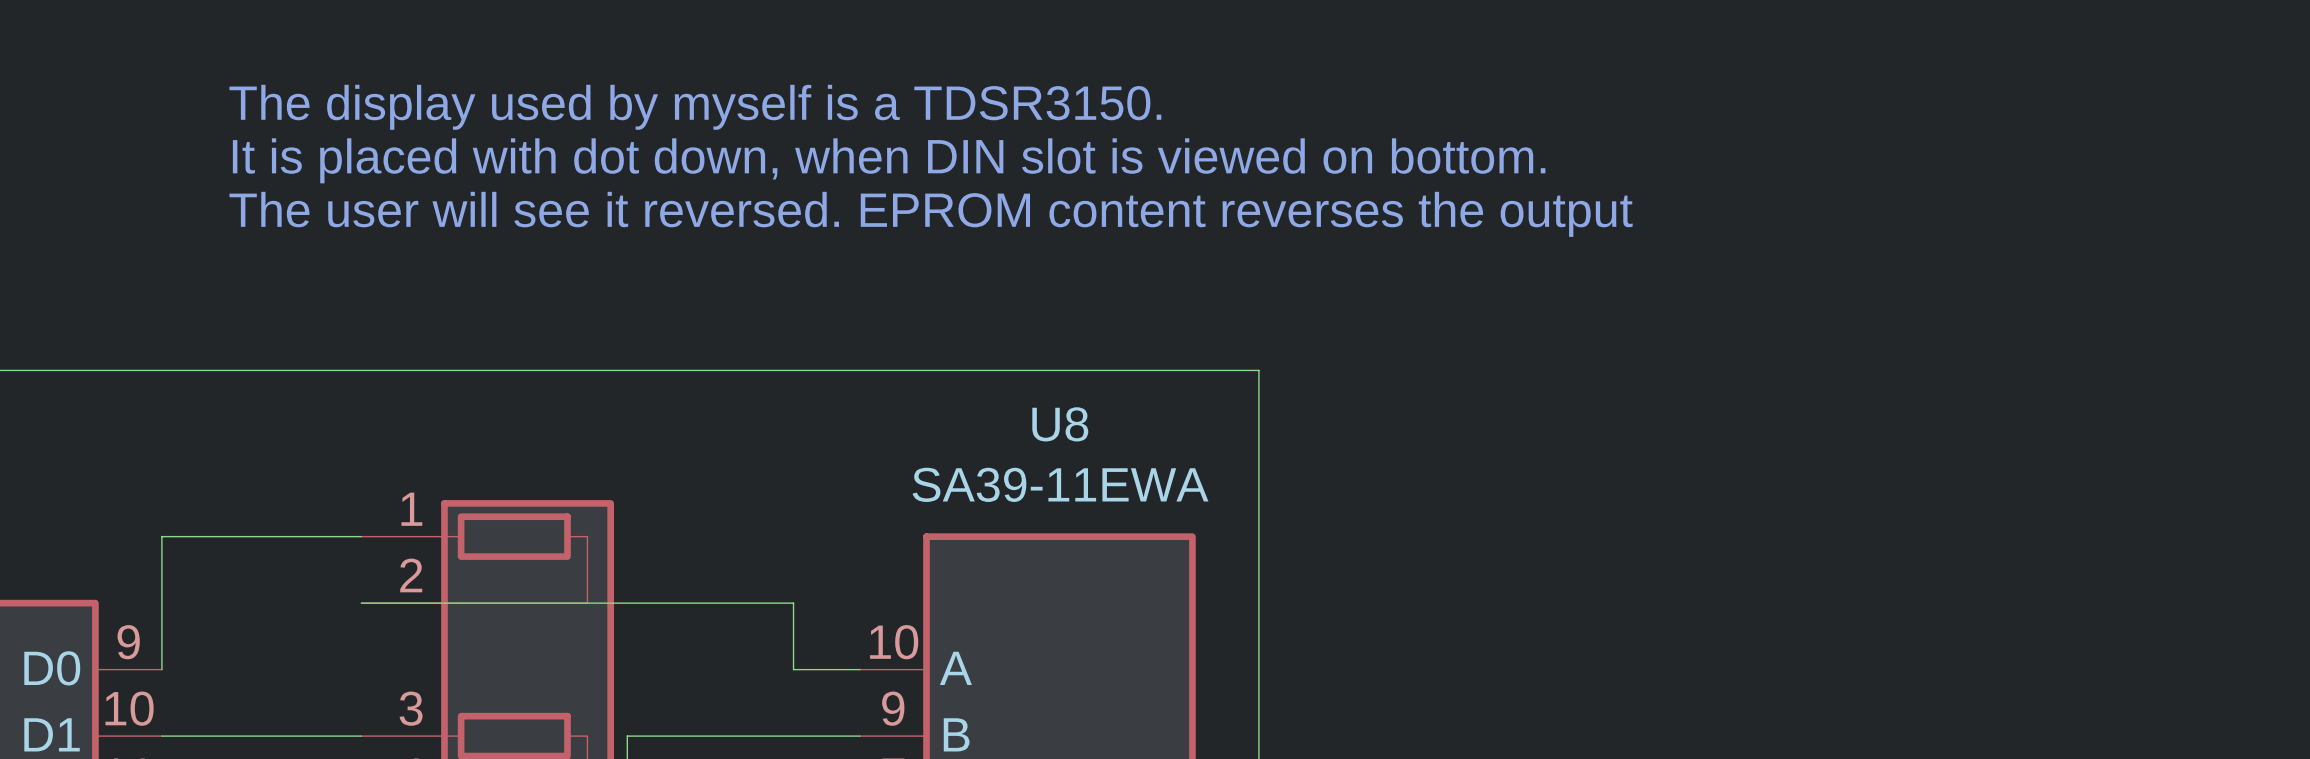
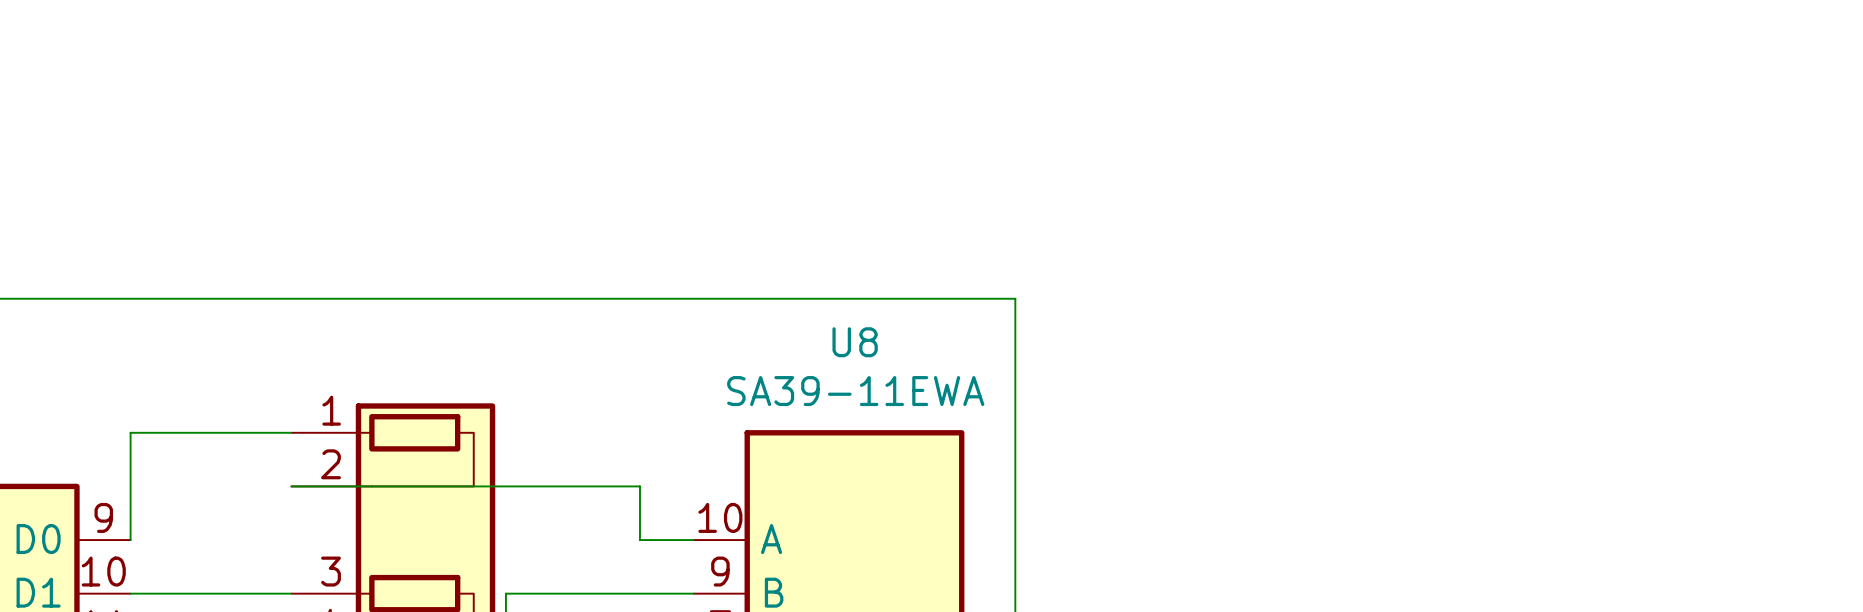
text: The display used by myself is a TDSR3150. (695, 107) -> none
text: It is placed with dot down, when DIN slot is viewed on bottom. (889, 160) -> none
text: The user will see it reversed. EPROM content reverses the output (931, 214) -> none

